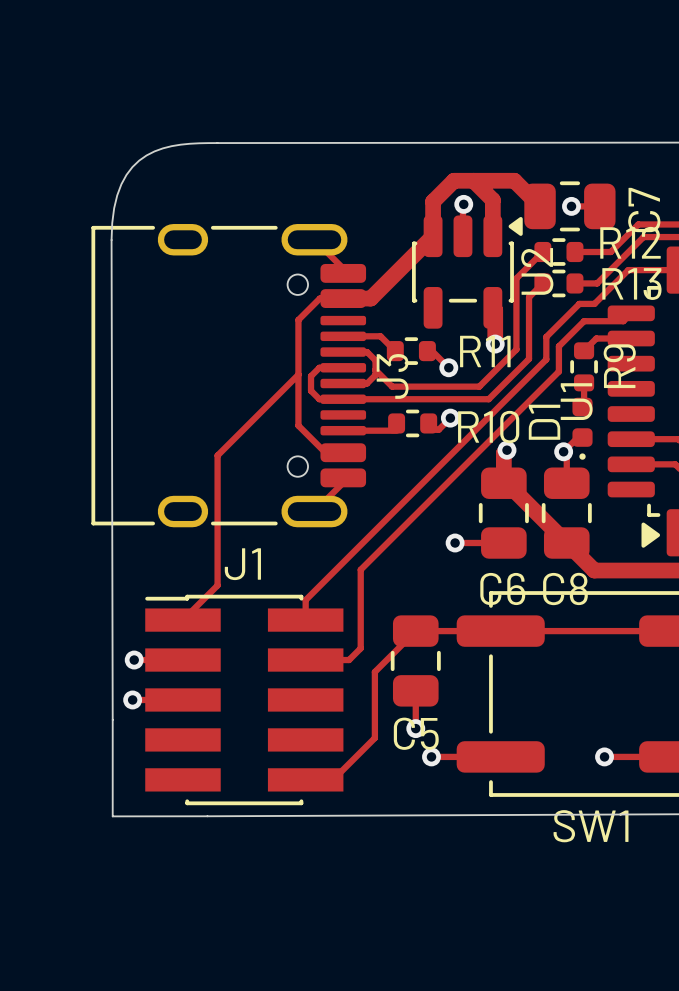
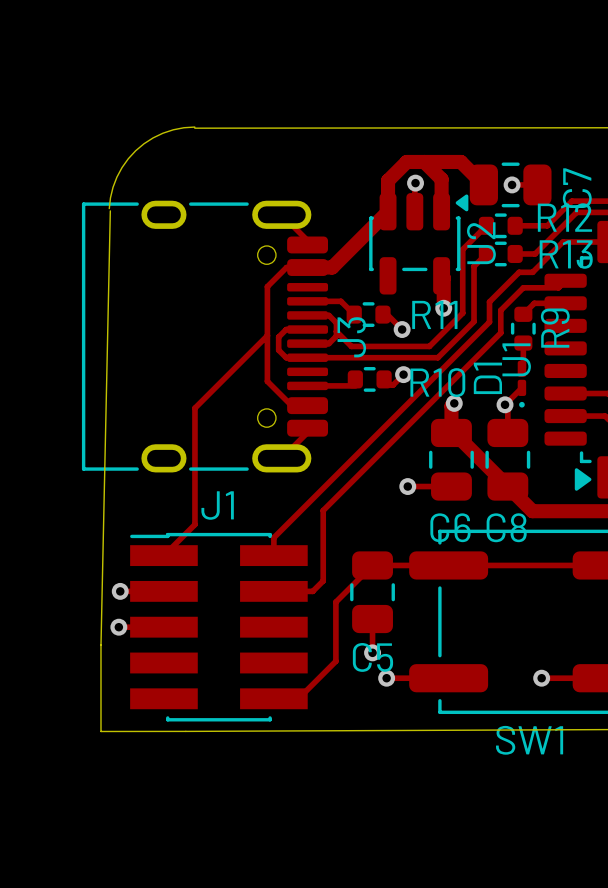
board edge: none -> (194, 127) (162, 133) (135, 150) (116, 177) (109, 208)
board edge: (217, 143) (171, 146) (146, 155) (126, 174) (117, 195) (114, 208) (111, 240) (112, 719) -> (110, 210) (100, 645)
D1 footprint: [572, 397, 593, 460] -> [517, 360, 527, 408]

